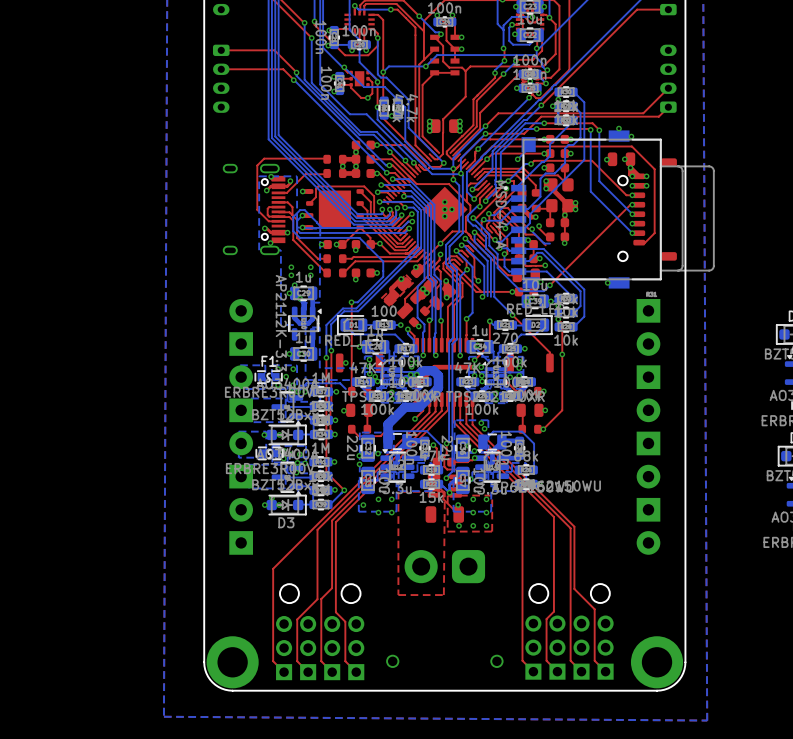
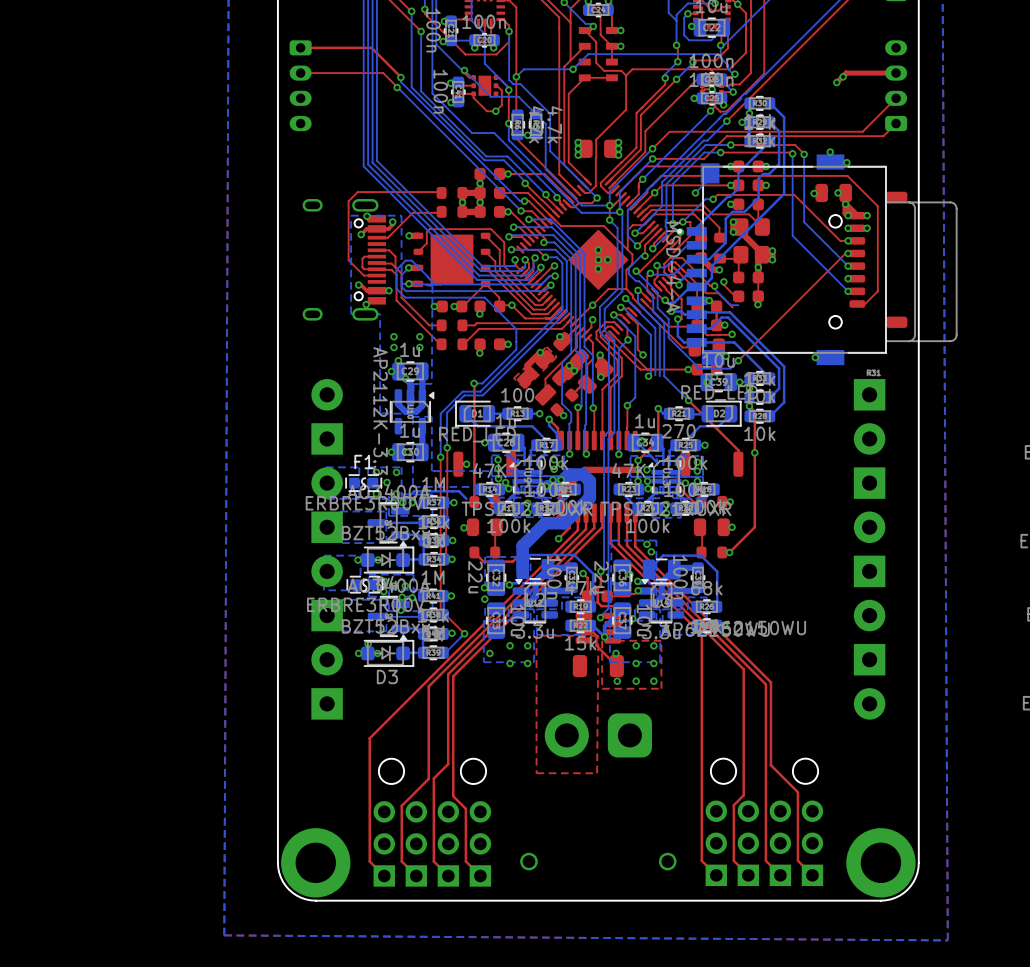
top track: none -> (896, 73) (846, 73) (836, 82)
via: none -> (843, 76)
via: none -> (836, 82)

